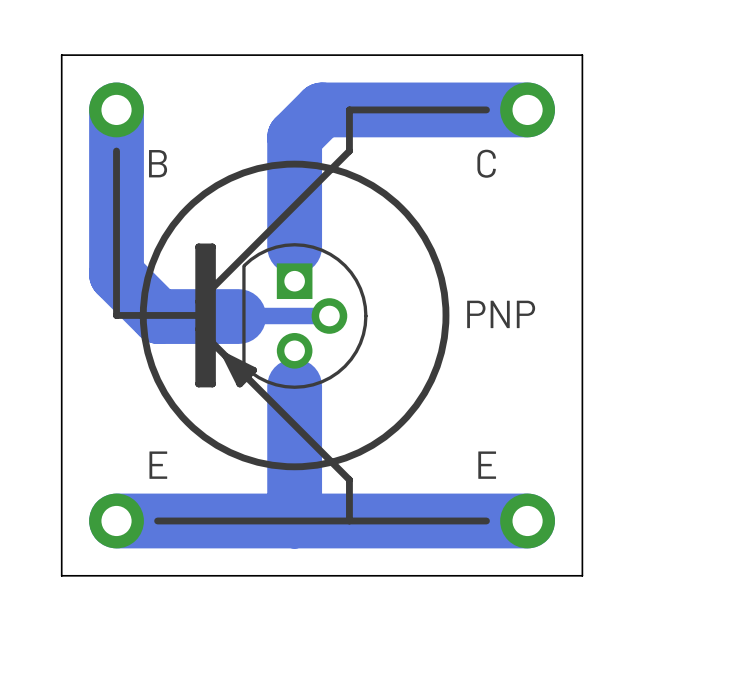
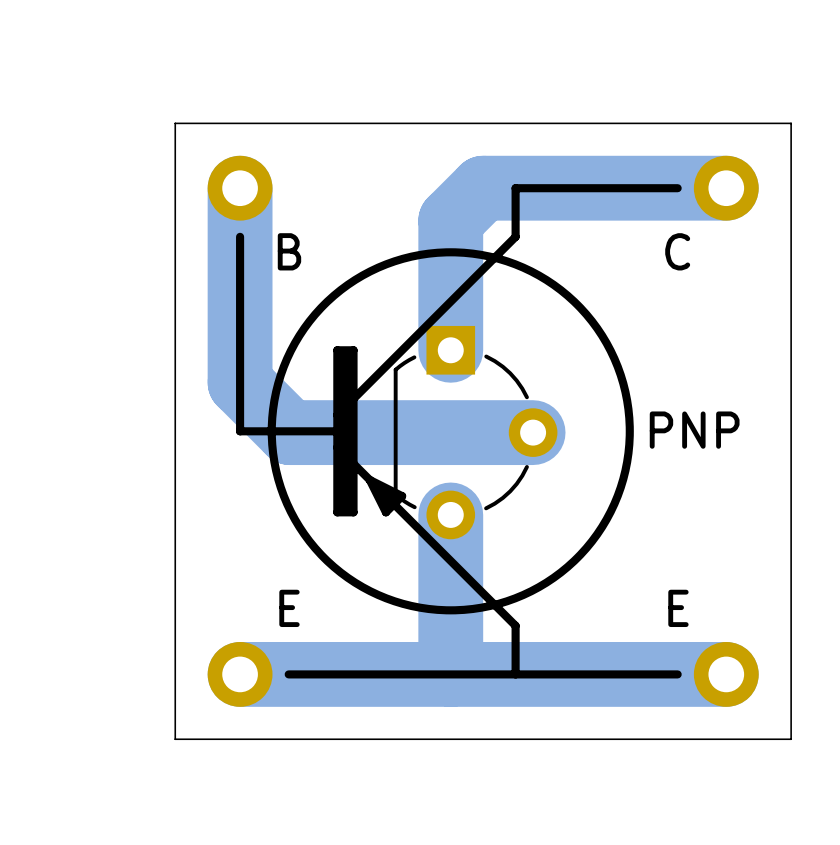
part footprint: [242, 243, 368, 389] -> [393, 325, 558, 540]
bottom track: (329, 316) (238, 316) -> (533, 432) (384, 432)

